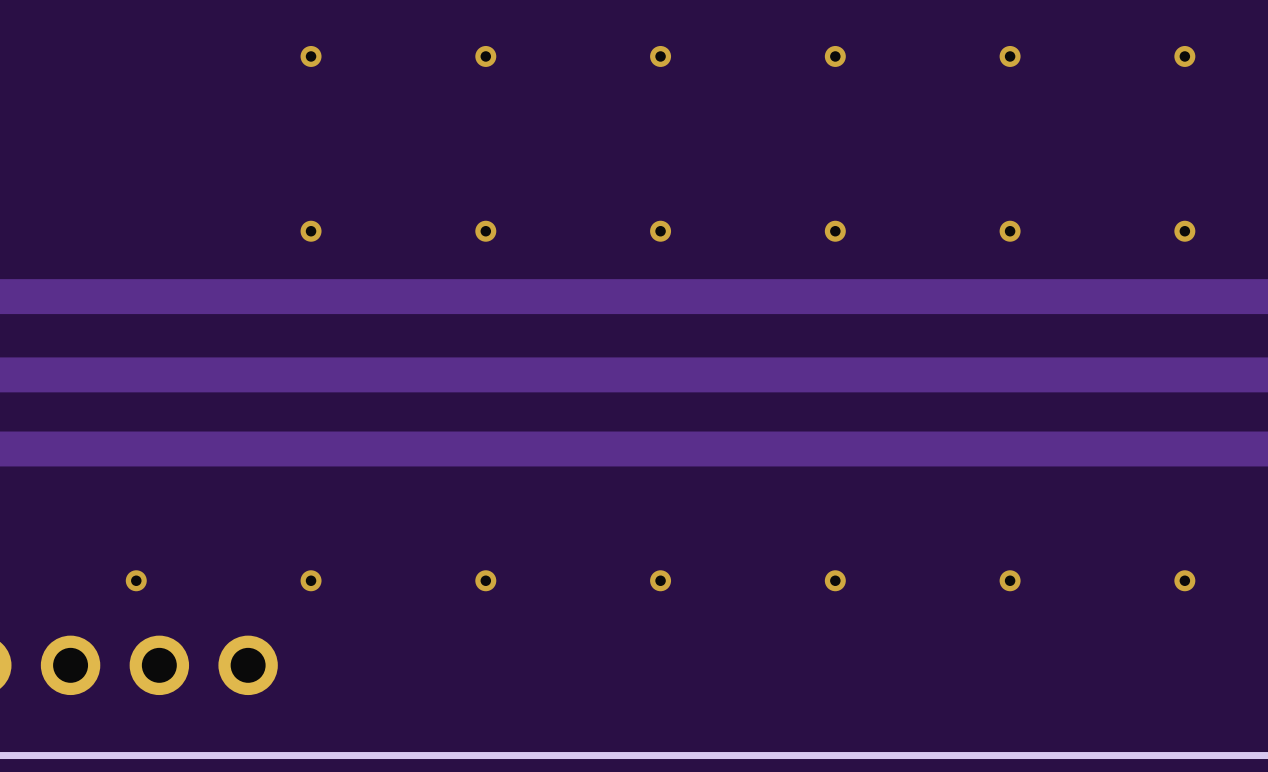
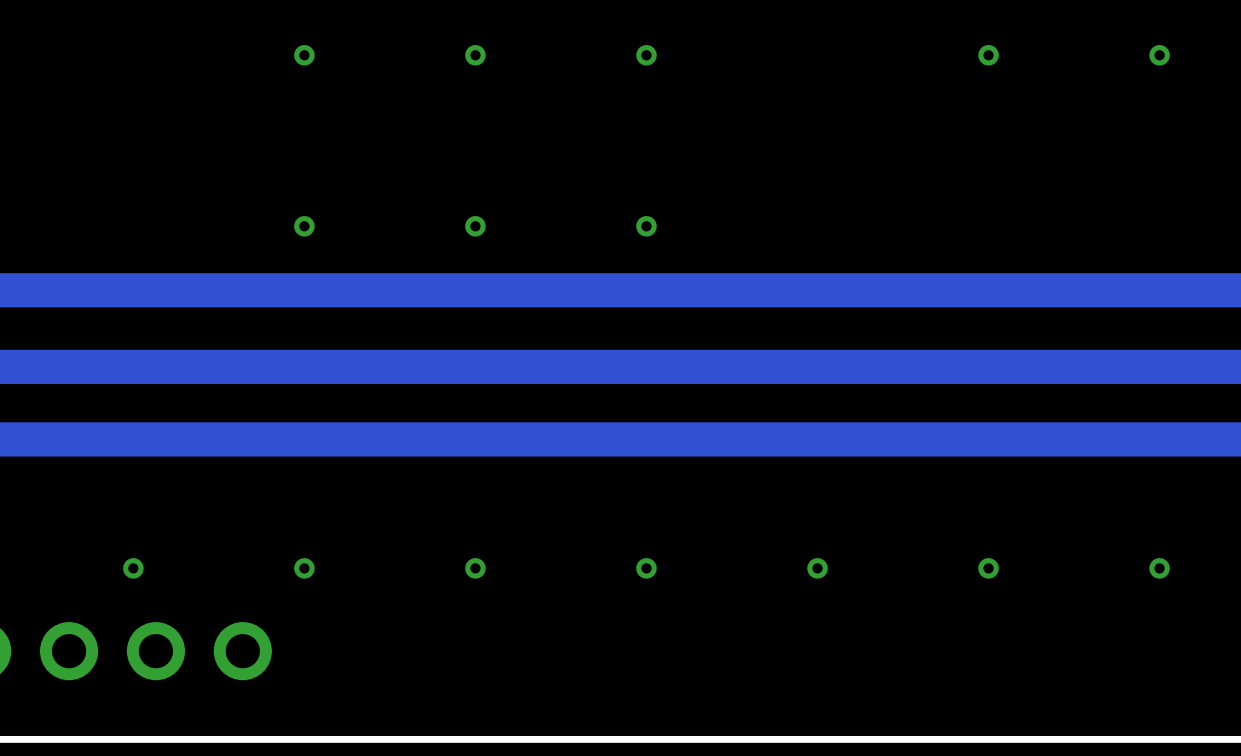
via: (835, 56) -> none
via: (835, 231) -> none
via: (1010, 231) -> none
via: (1184, 231) -> none

